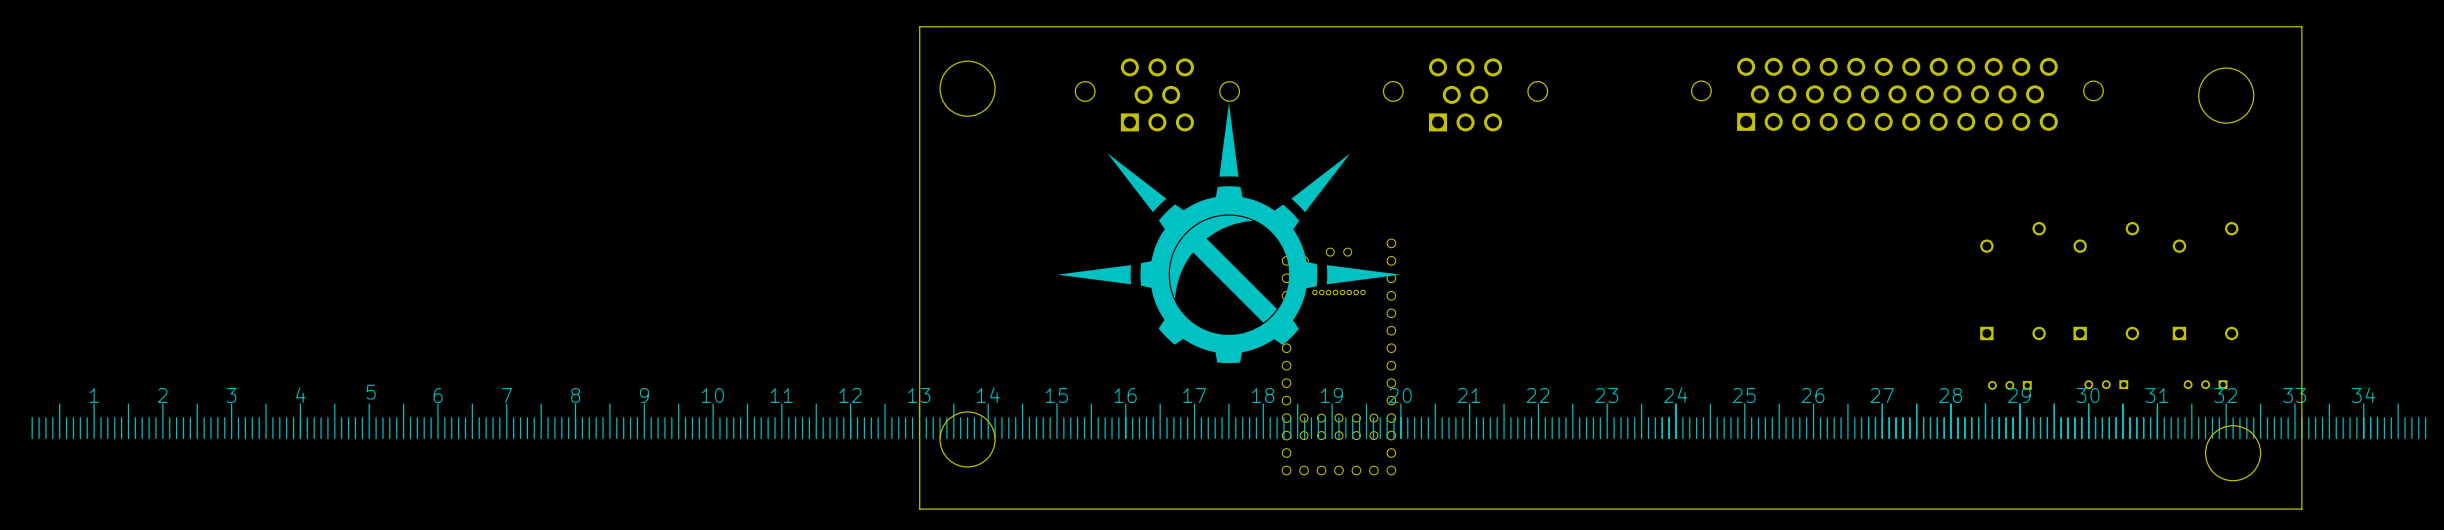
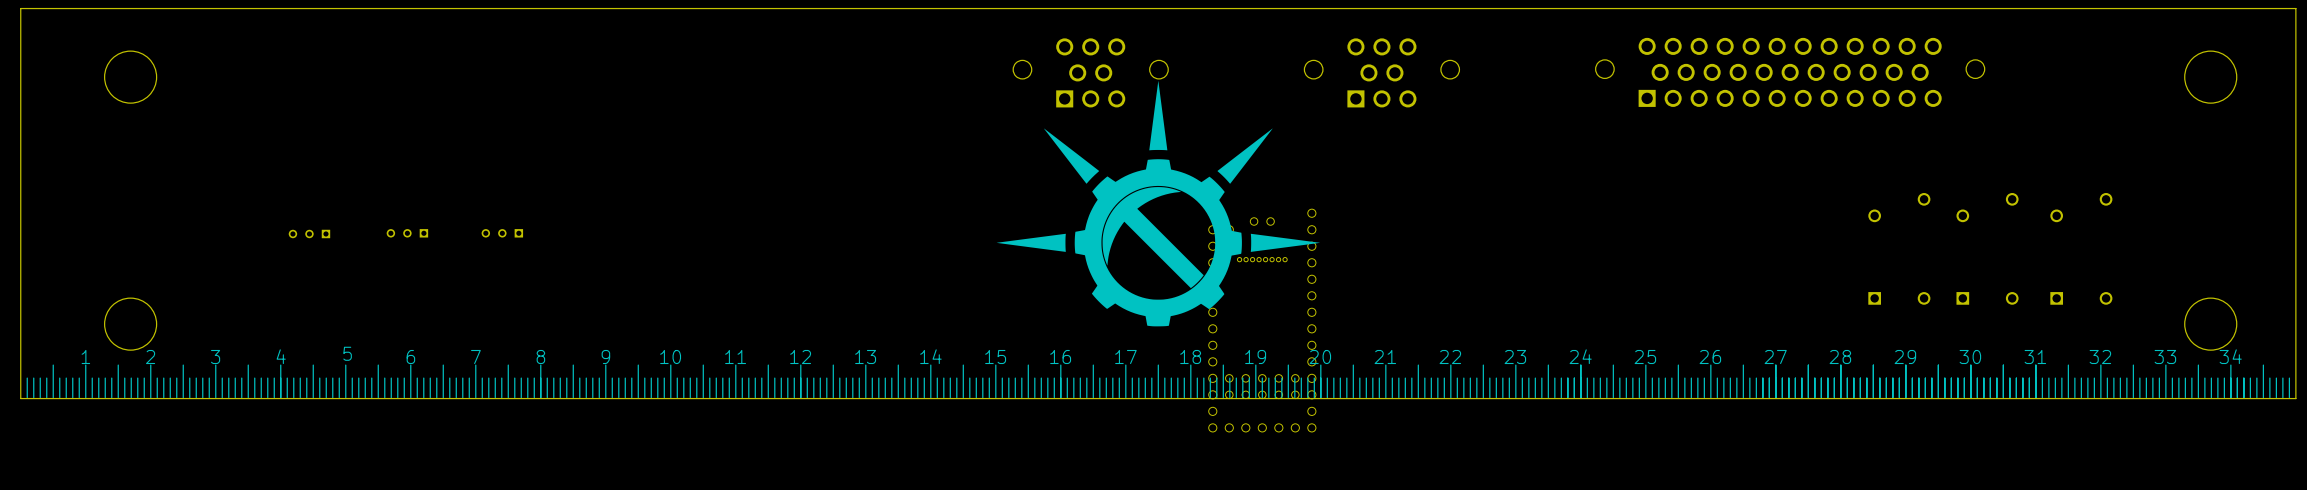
board edge: (2301, 26) (2301, 509) (919, 509) (919, 26) -> (2172, 8) (2295, 8) (2295, 398) (20, 398) (20, 8) (866, 8)
round board edge: [939, 61, 996, 117] -> none
round board edge: none -> [104, 50, 157, 104]
round board edge position: (2226, 95) -> (2210, 77)
part: none -> (407, 233)
part: none -> (502, 233)
part: none -> (309, 233)
round board edge: none -> [104, 297, 157, 351]
part: (2106, 384) -> none
part: (2205, 384) -> none
part: (2009, 385) -> none
round board edge: [939, 411, 996, 468] -> none
round board edge position: (2233, 453) -> (2210, 324)

